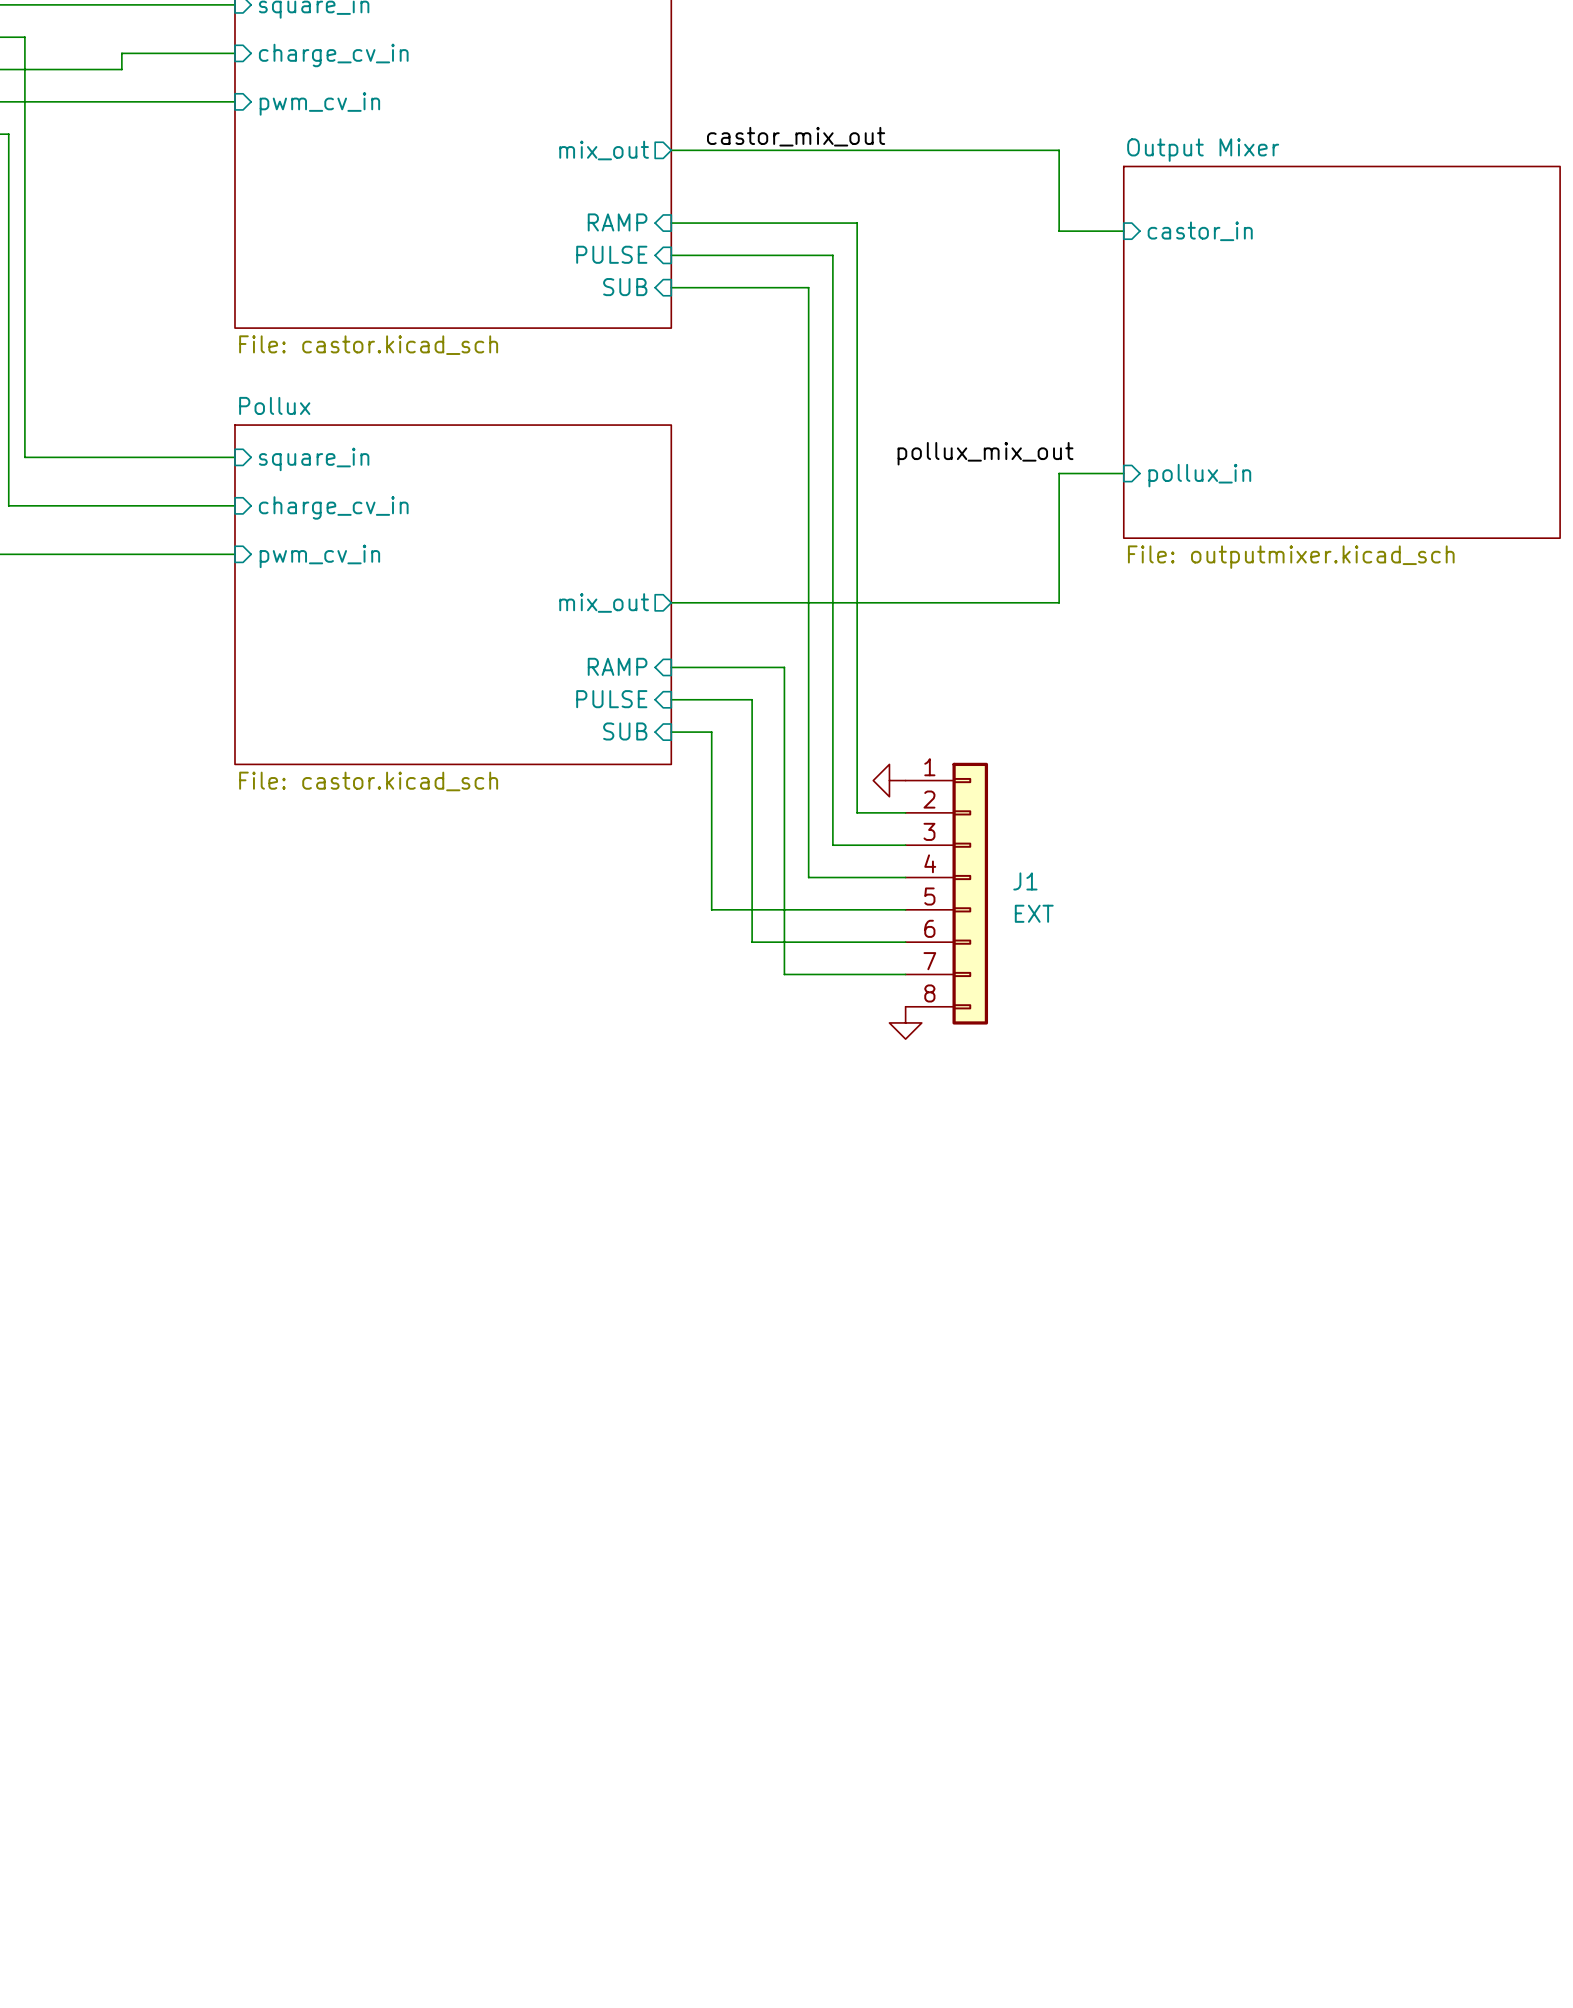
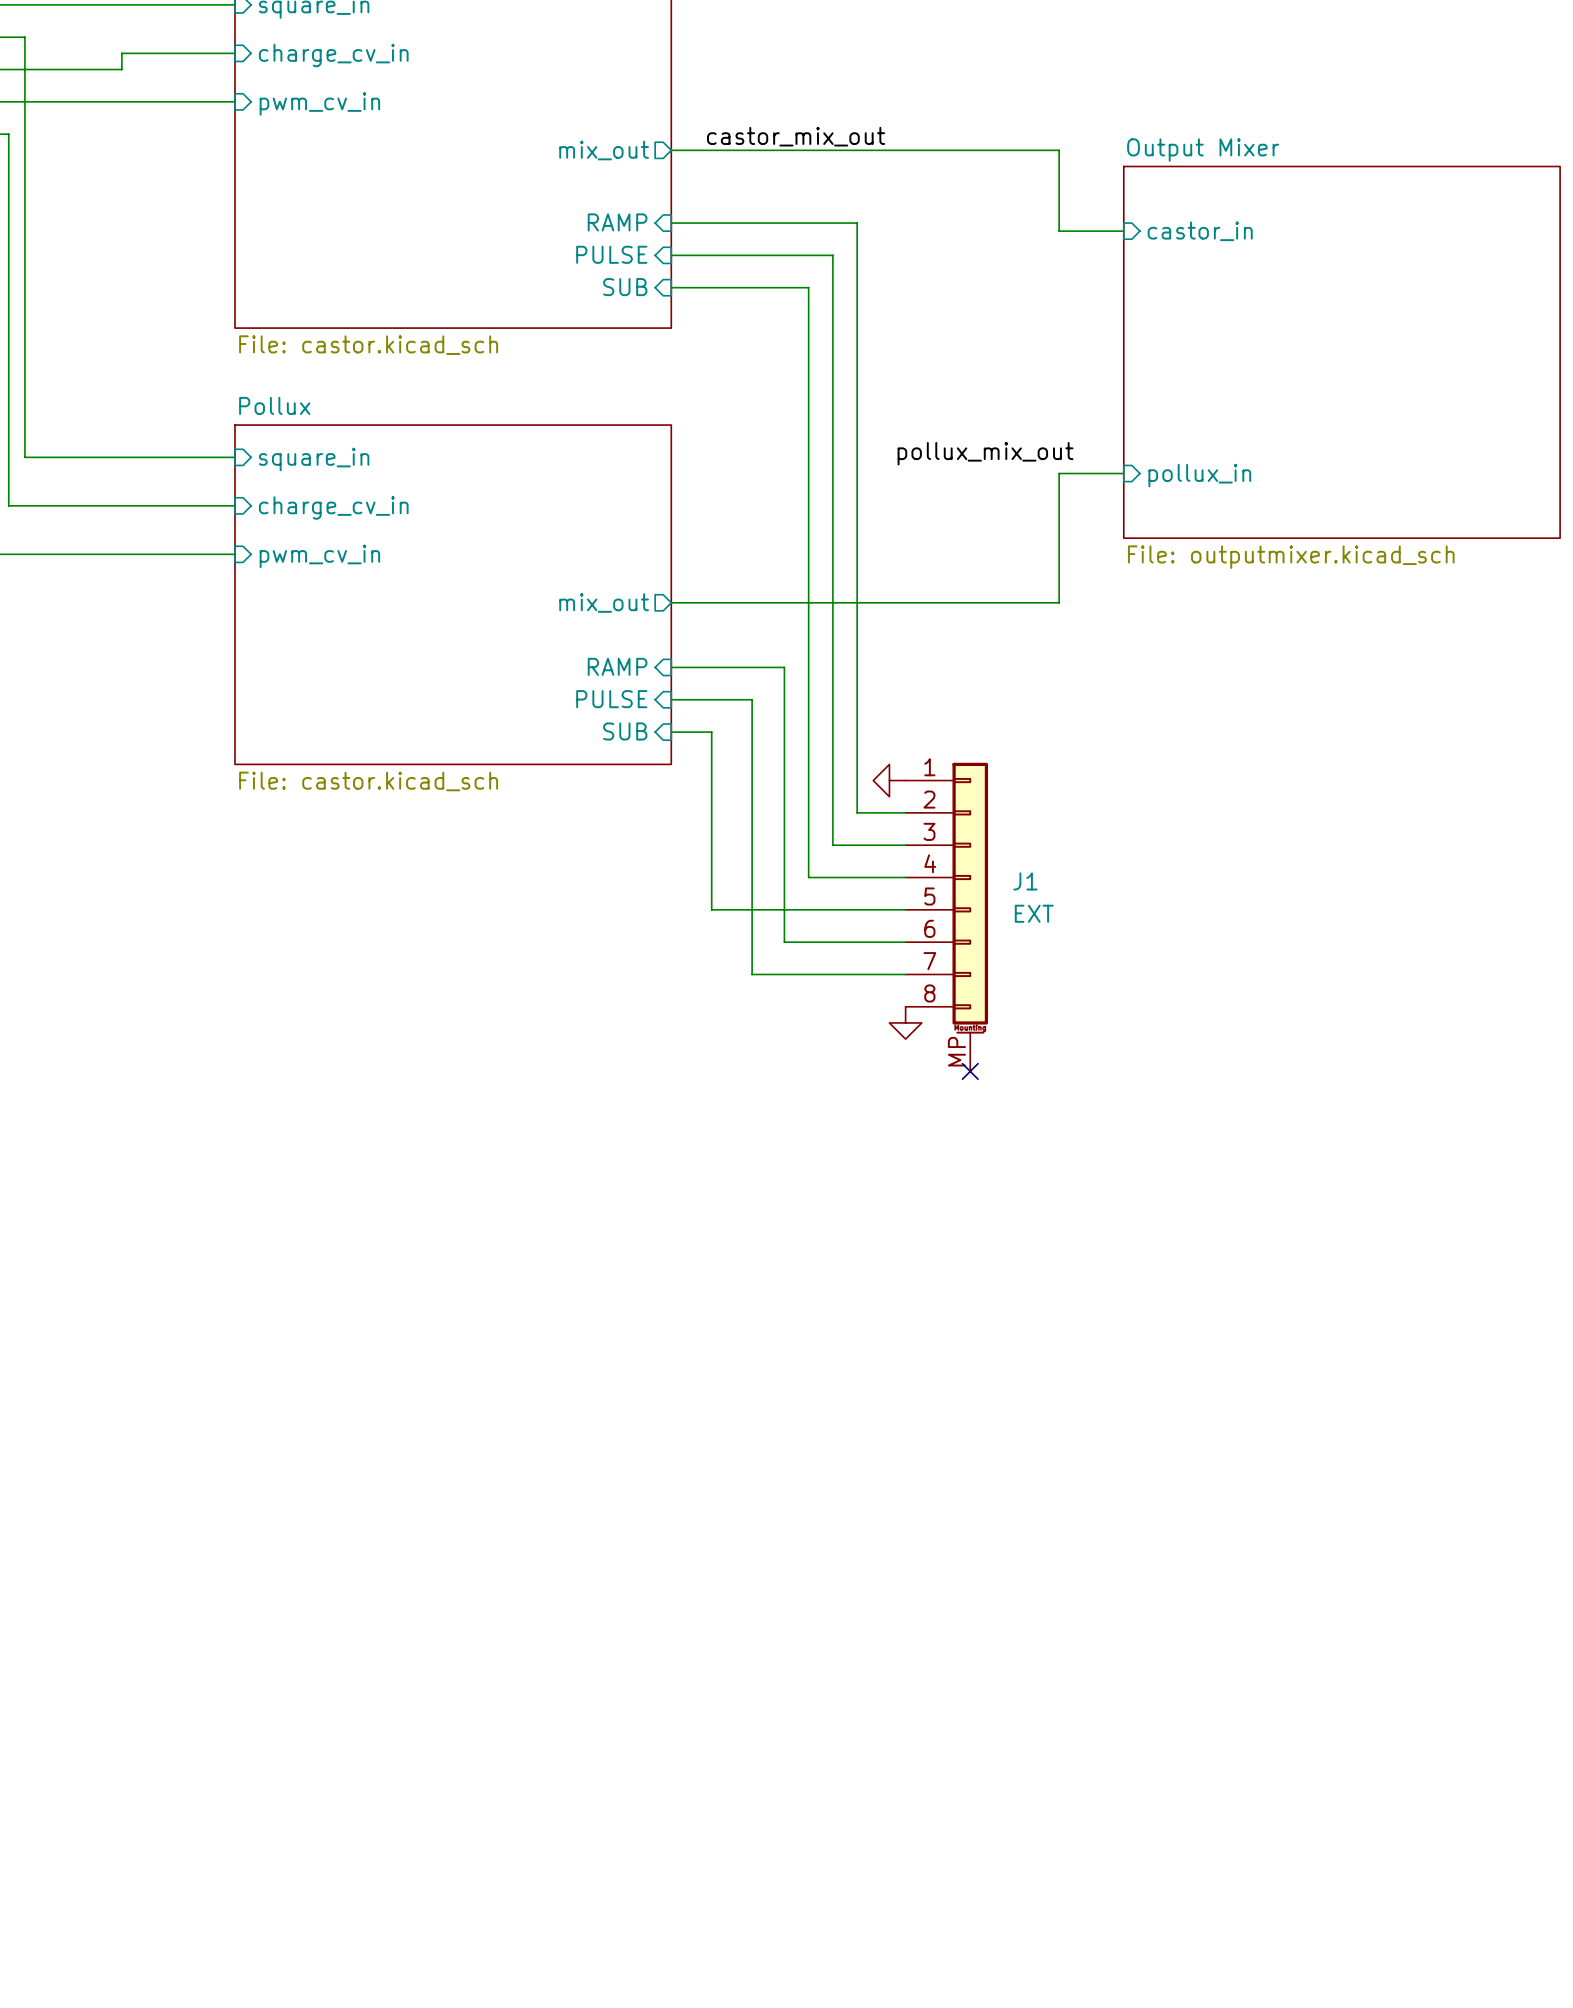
J1 symbol: [905, 762, 989, 1025] -> [905, 762, 989, 1072]
wire: (752, 942) (784, 942) (784, 974) -> (752, 942) (752, 974) (784, 974)
no-connect mark: none -> (970, 1071)

